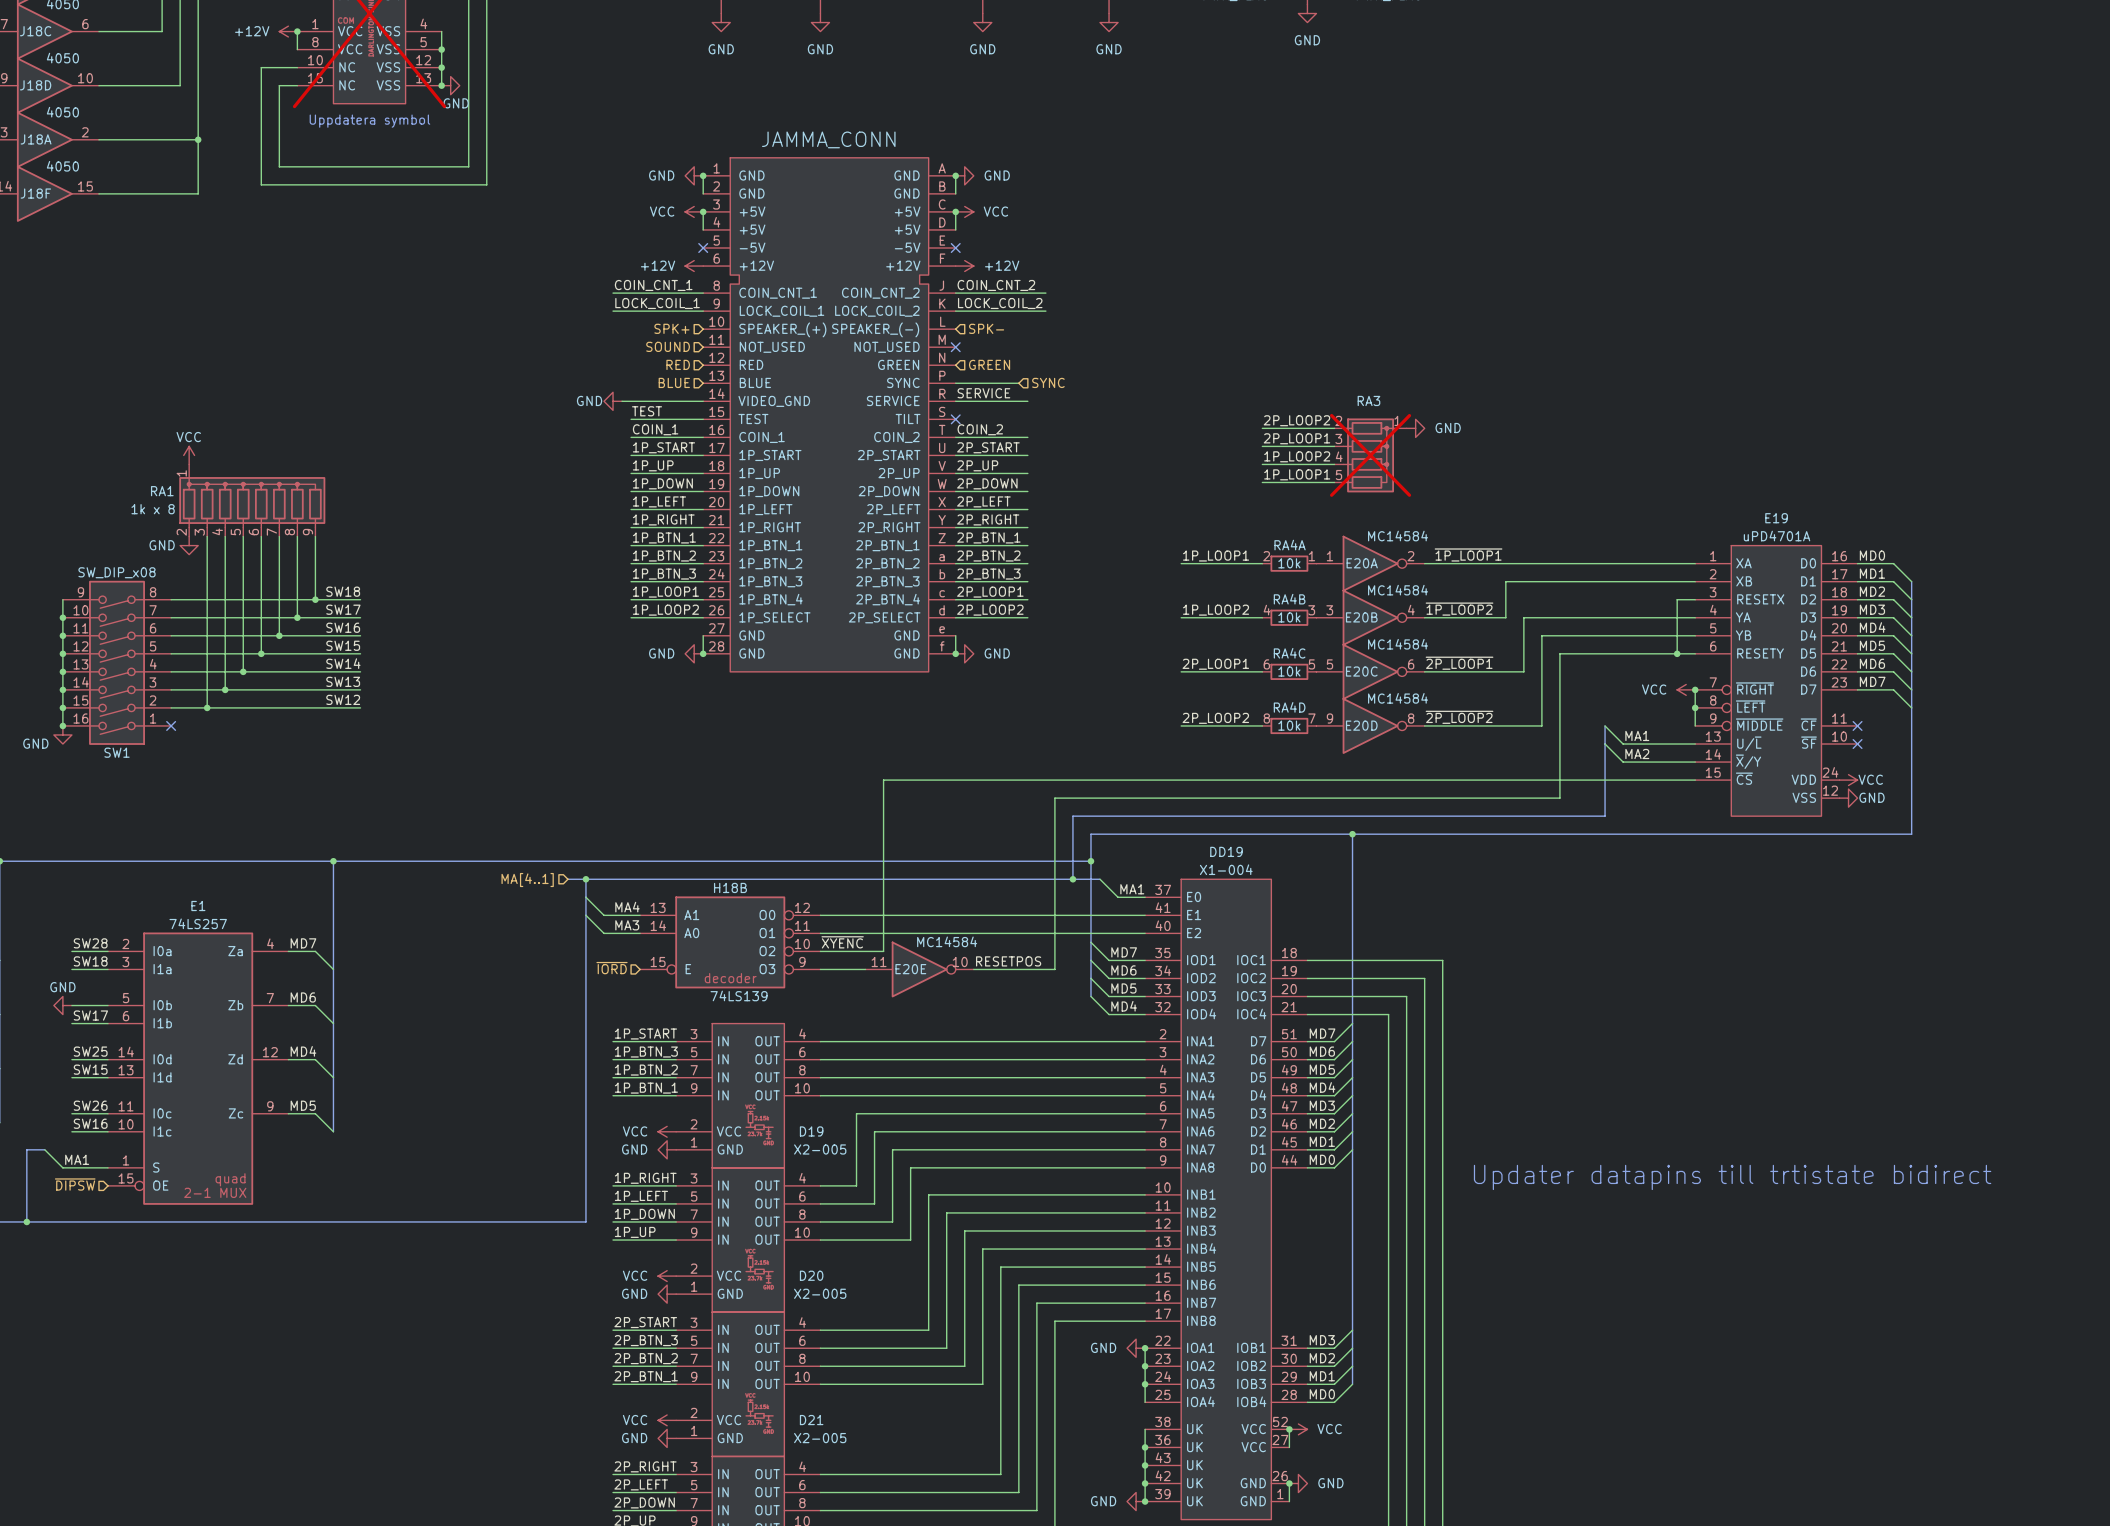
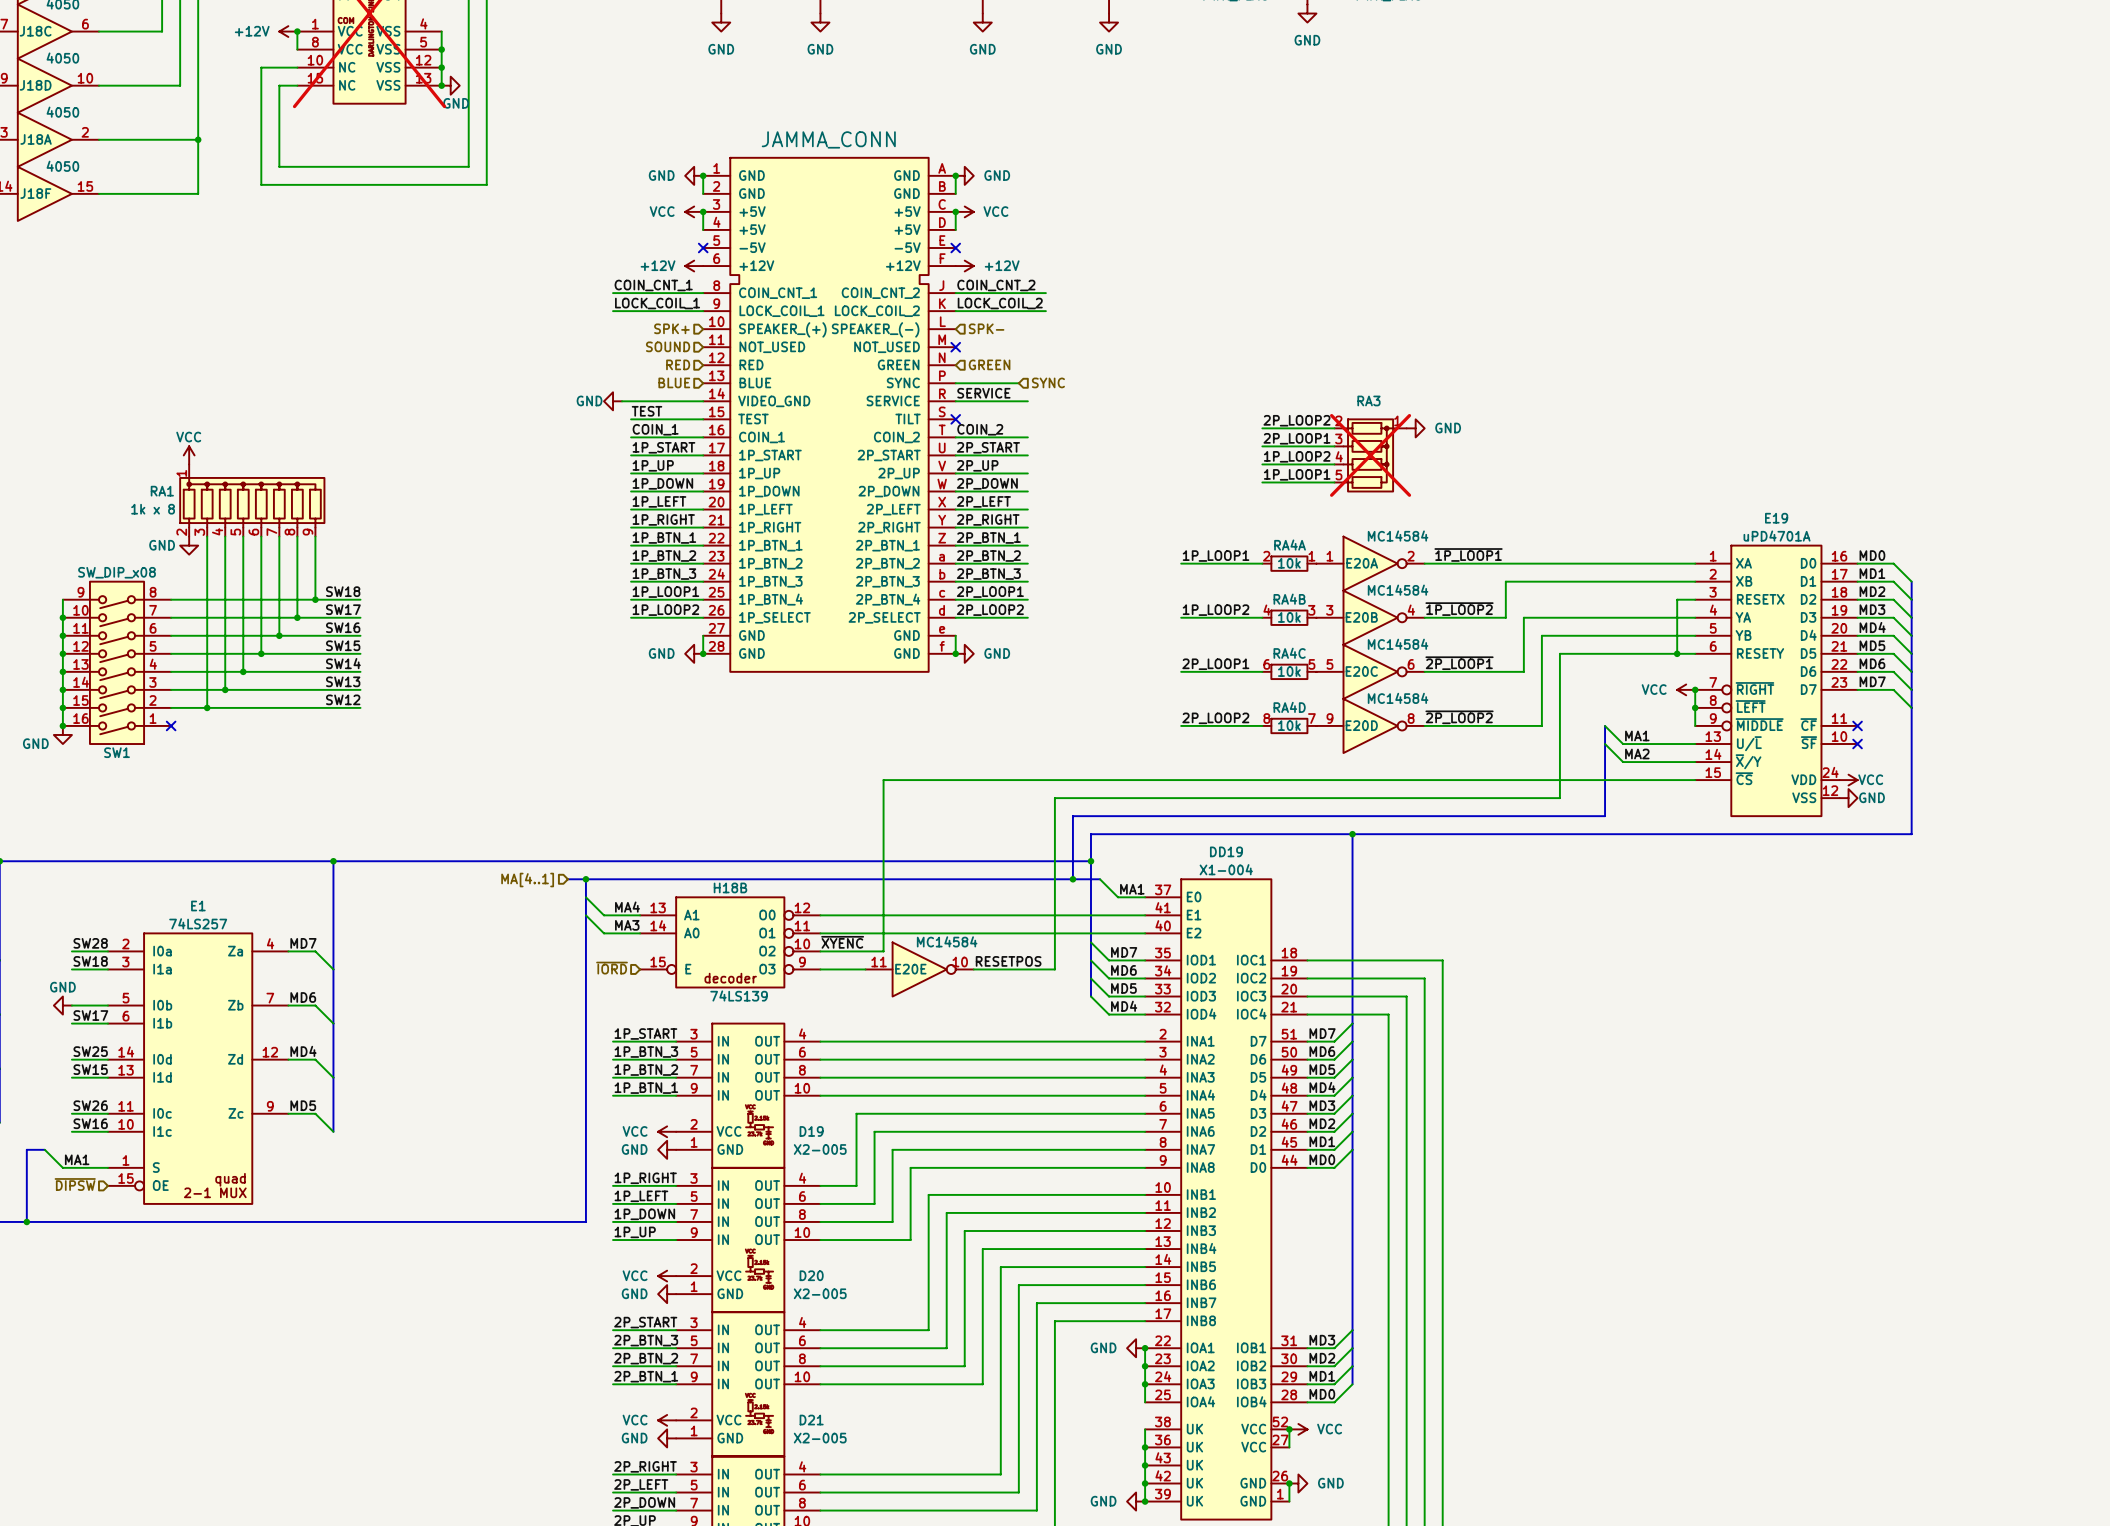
text: Uppdatera symbol (369, 121) -> none
text: Updater datapins till trtistate bidirect (1732, 1177) -> none

